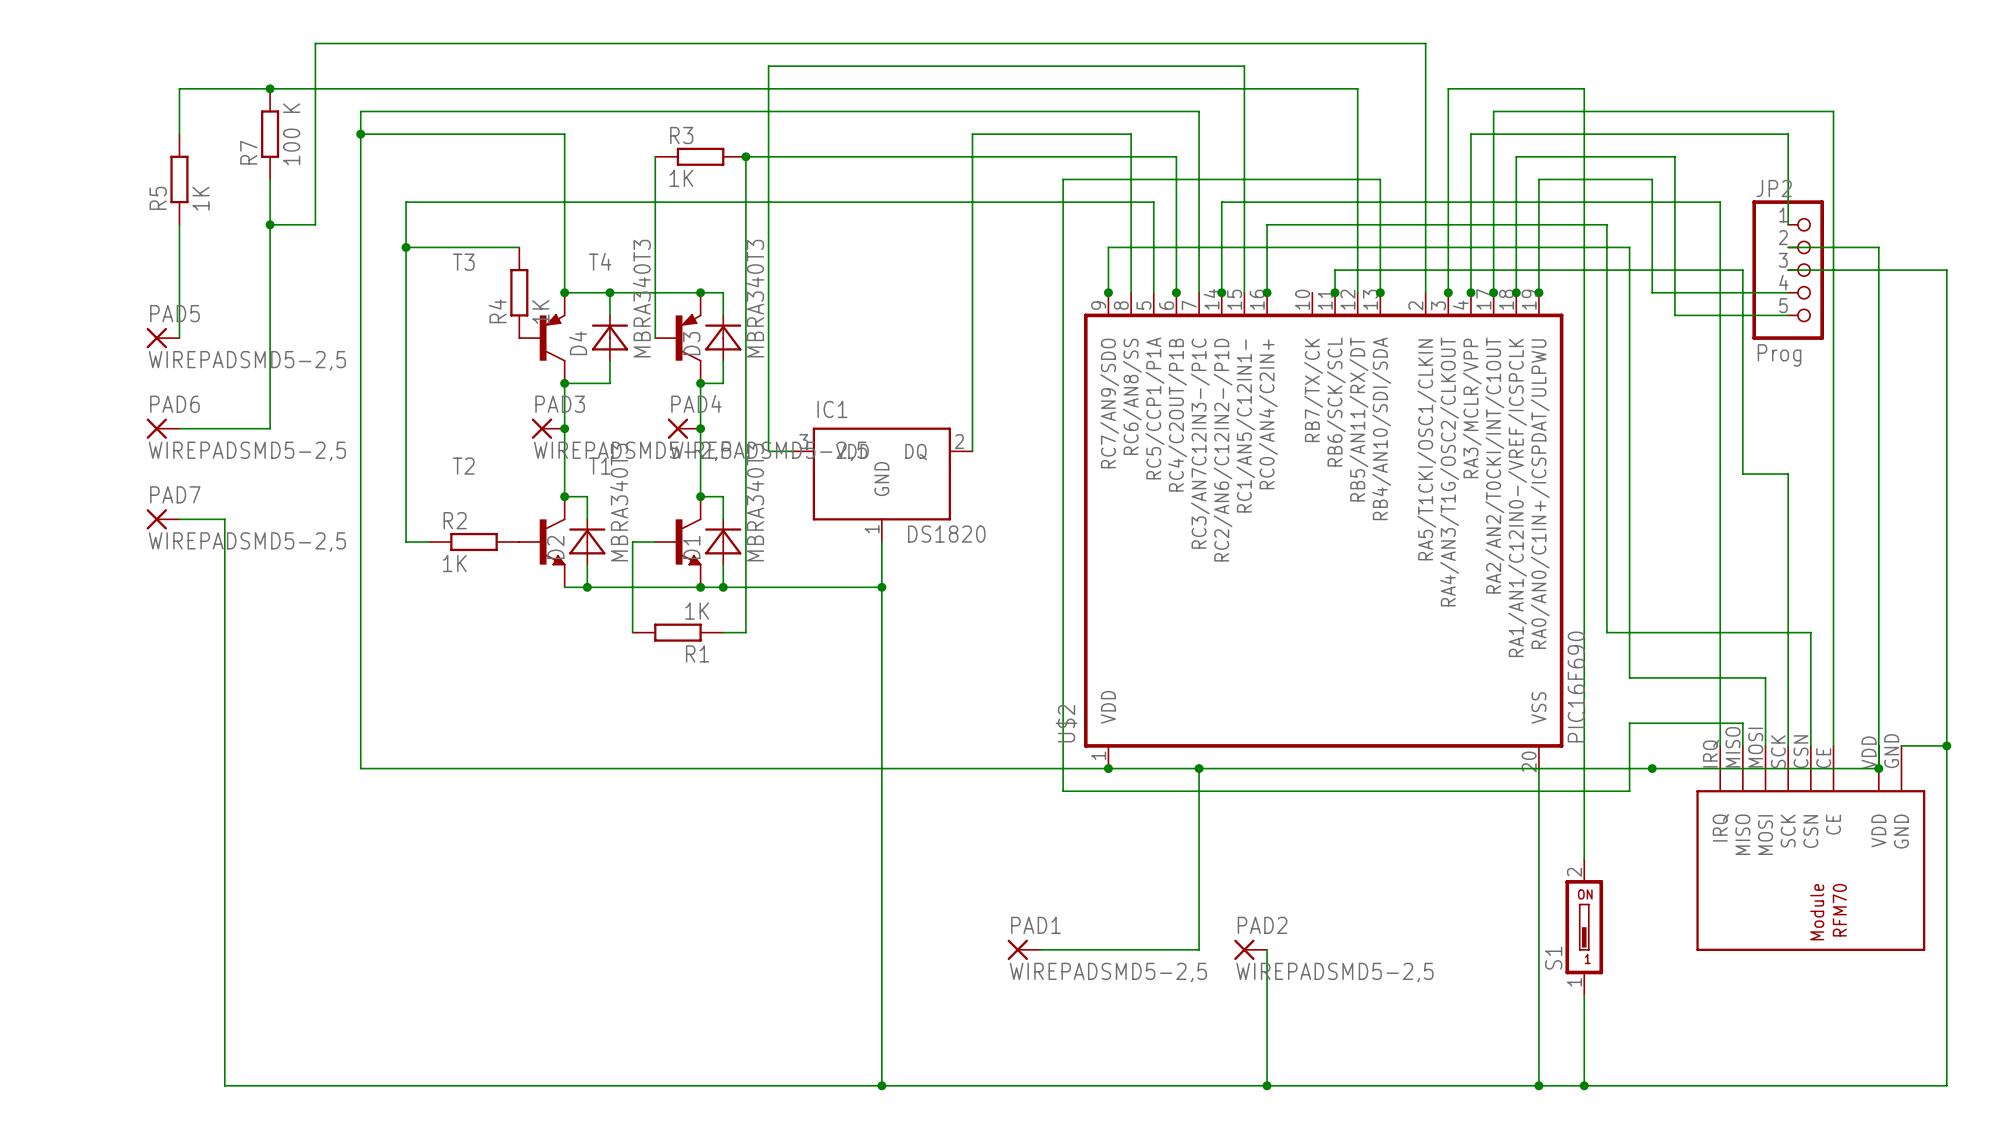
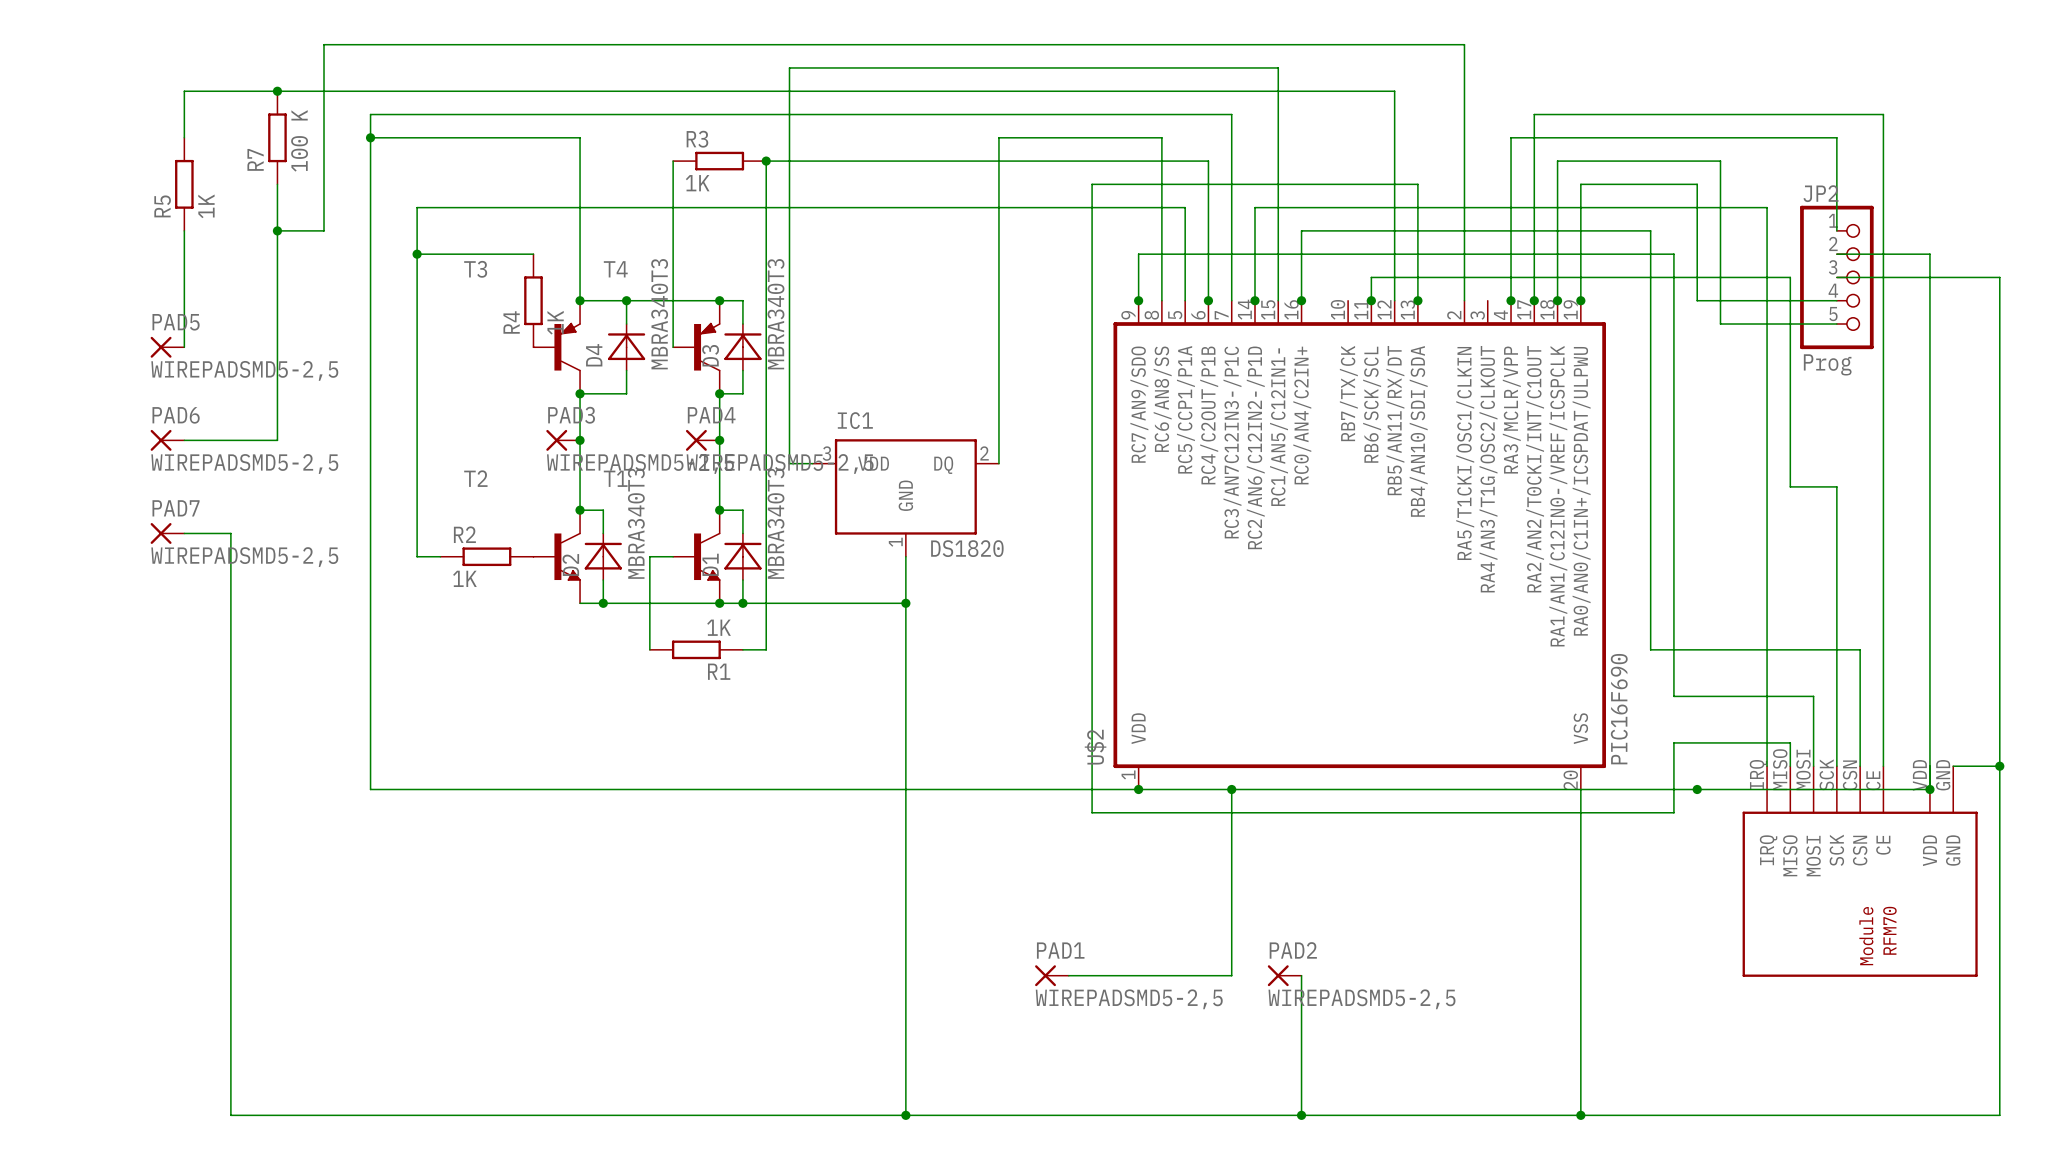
wire: (1448, 292) (1448, 88) (1584, 88) (1584, 859) -> none
junction: (1448, 292) -> none
S1: (1584, 927) -> none
wire: (1584, 995) (1584, 1085) -> none
junction: (1584, 1085) -> none

